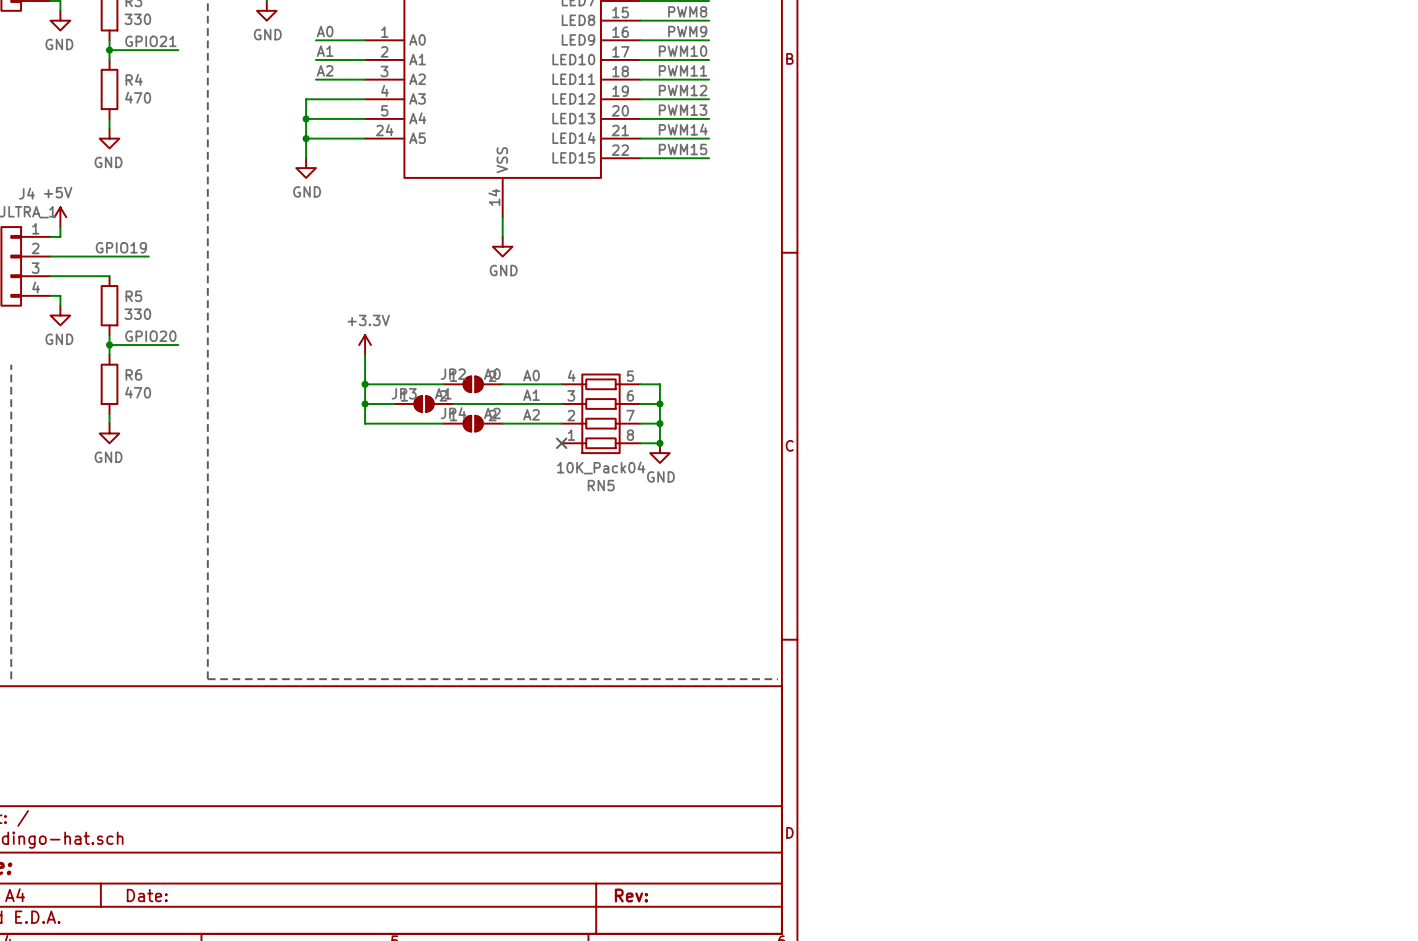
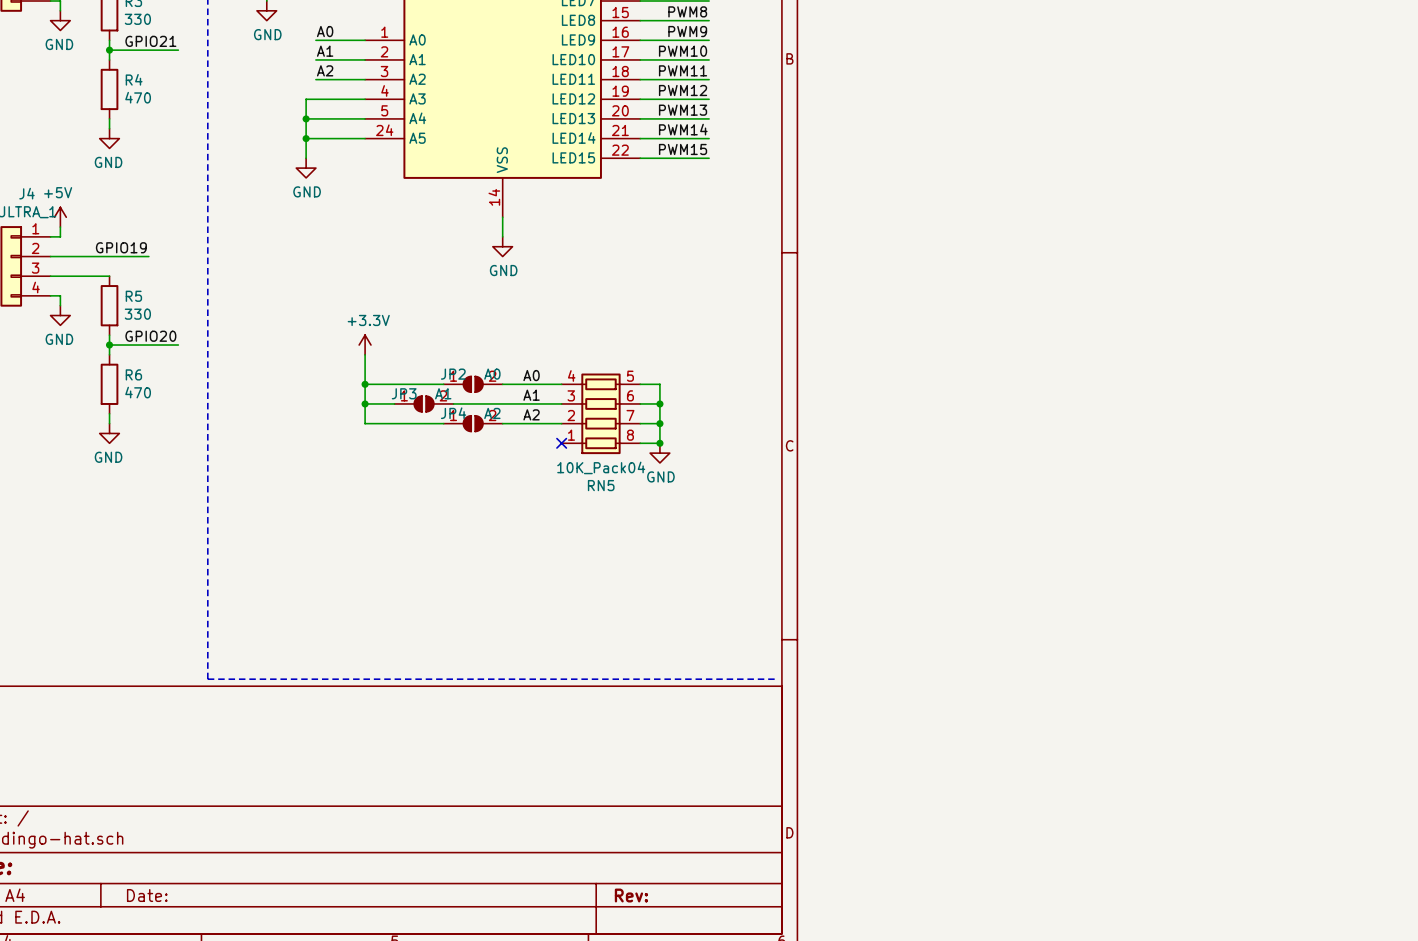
line: (11, 364) (11, 679) -> none

